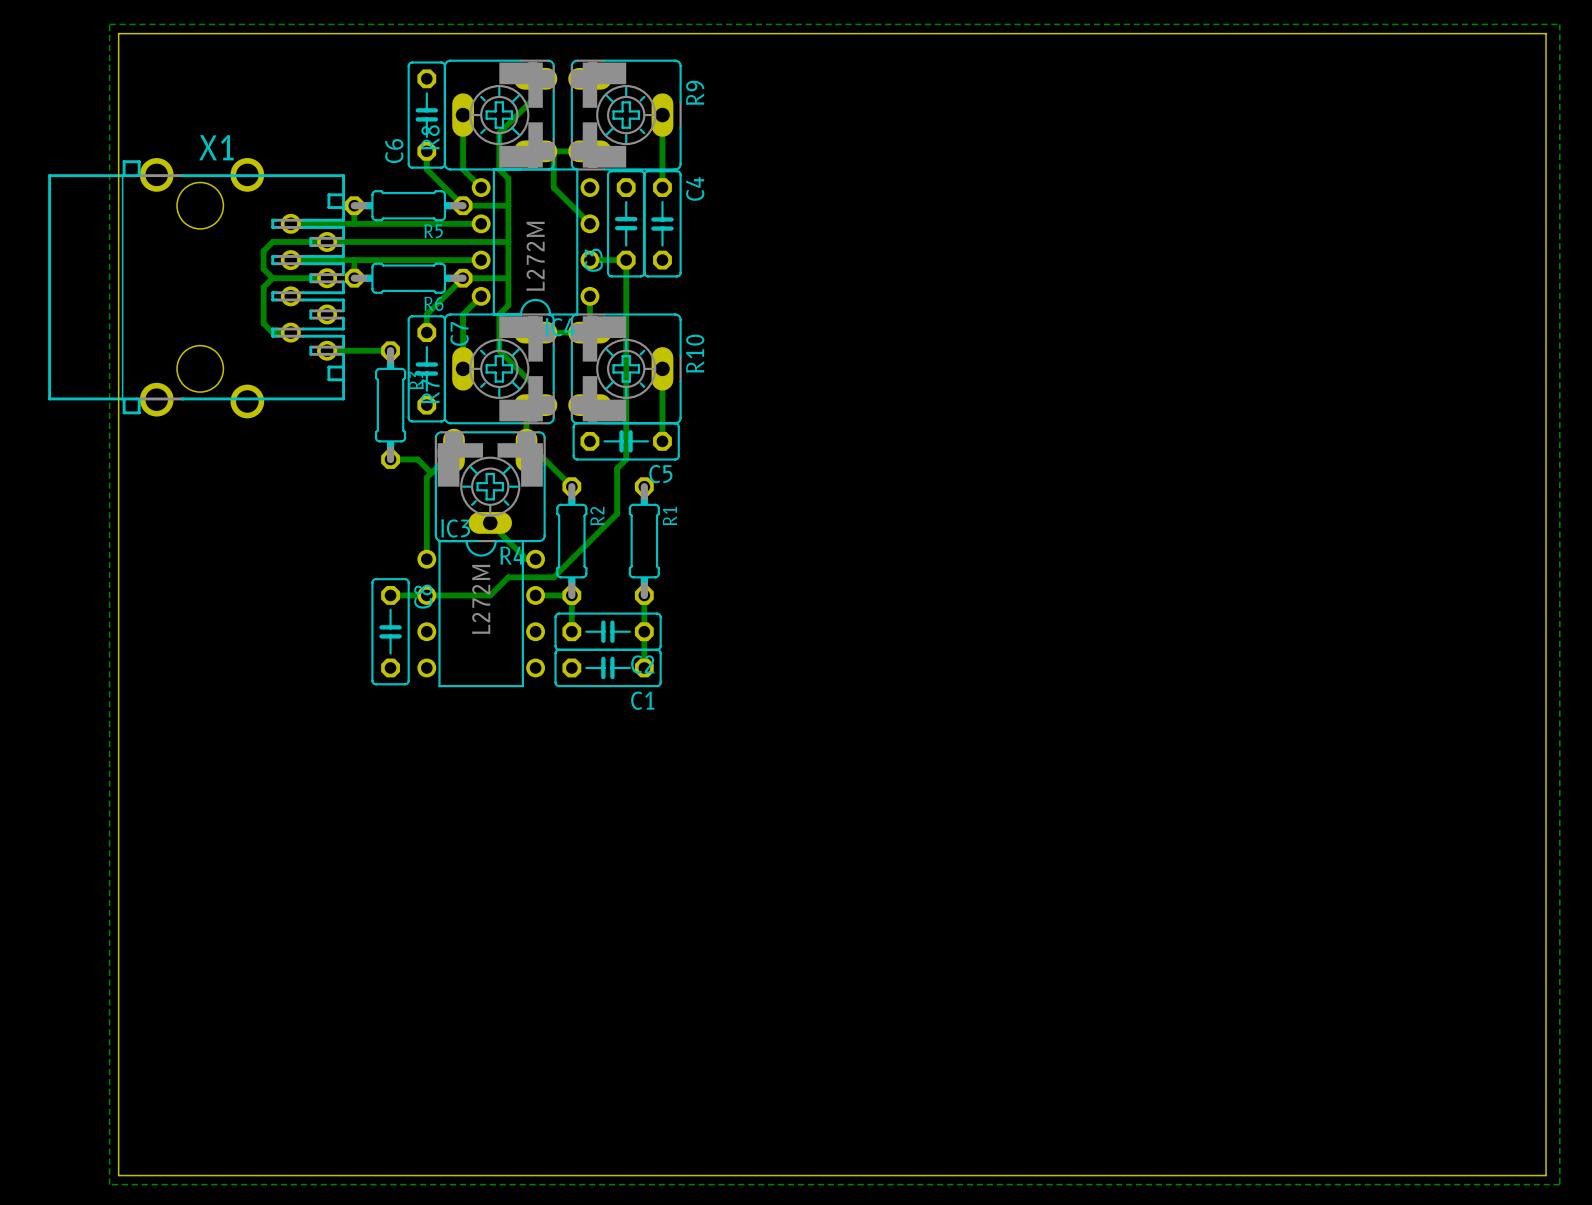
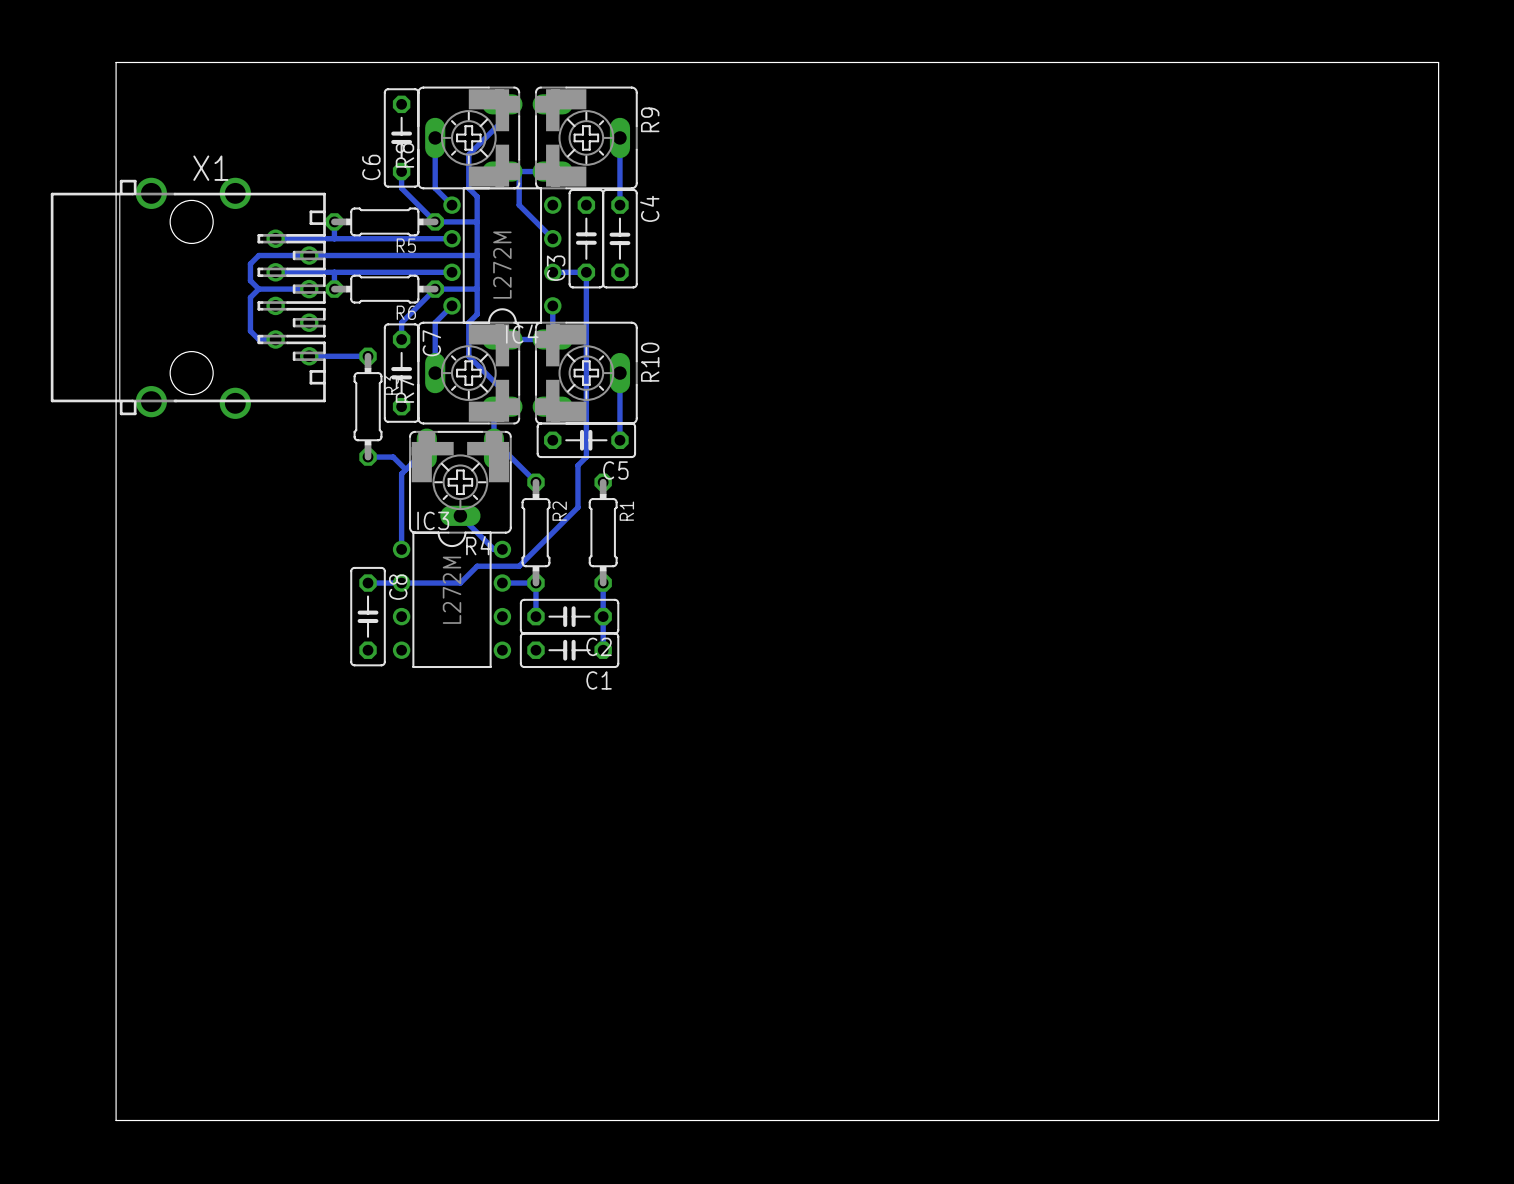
bottom zone outline: (109, 24) (1559, 24) (1559, 1184) (109, 1184) (109, 24) -> none

